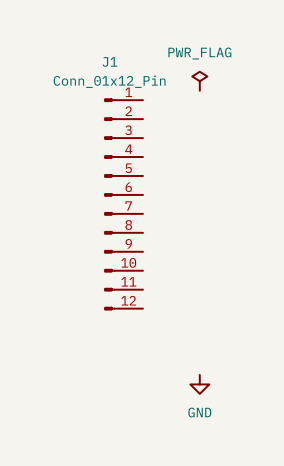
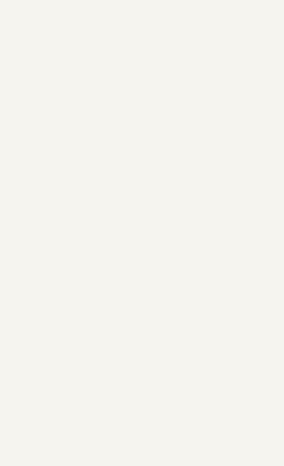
power symbol: PWR_FLAG (199, 81) -> none
J1: Conn_01x12_Pin (123, 204) -> none
power symbol: GND (199, 384) -> none

